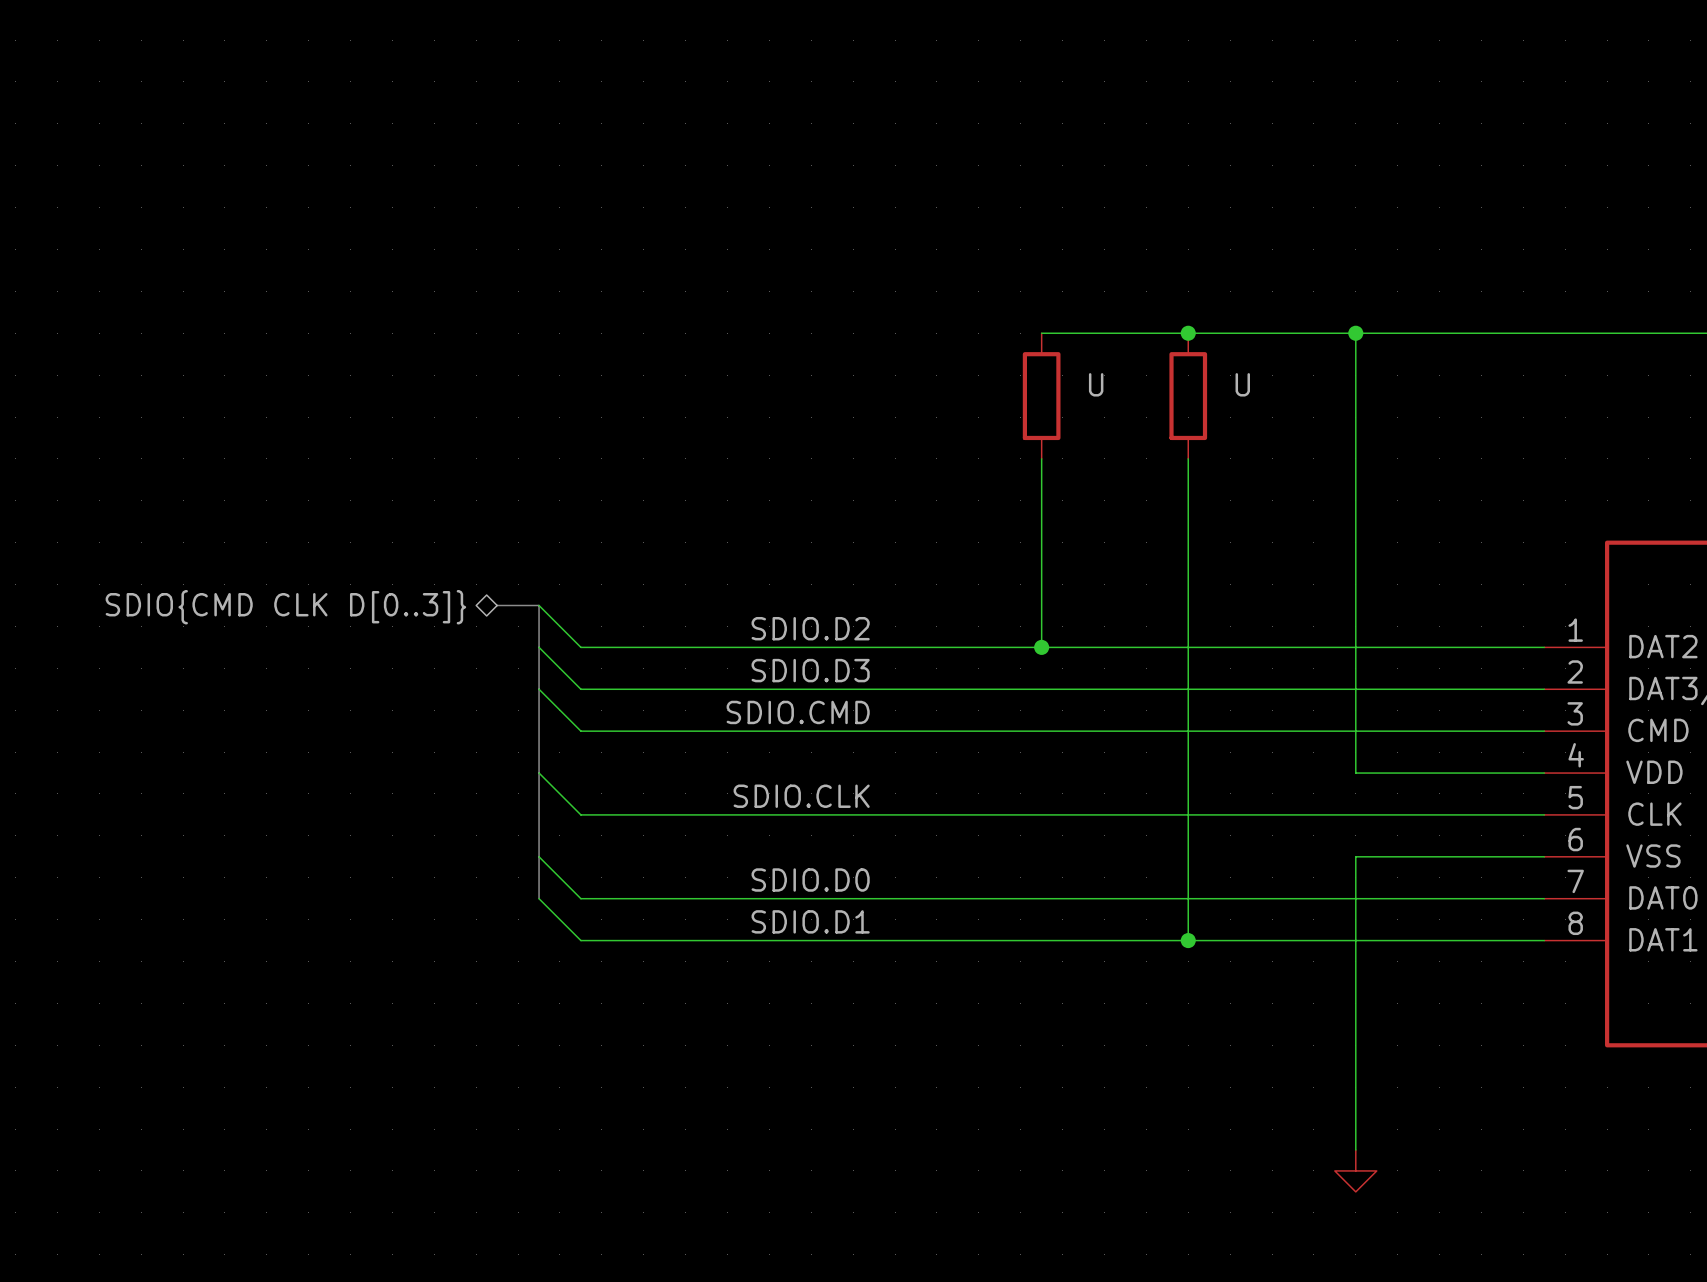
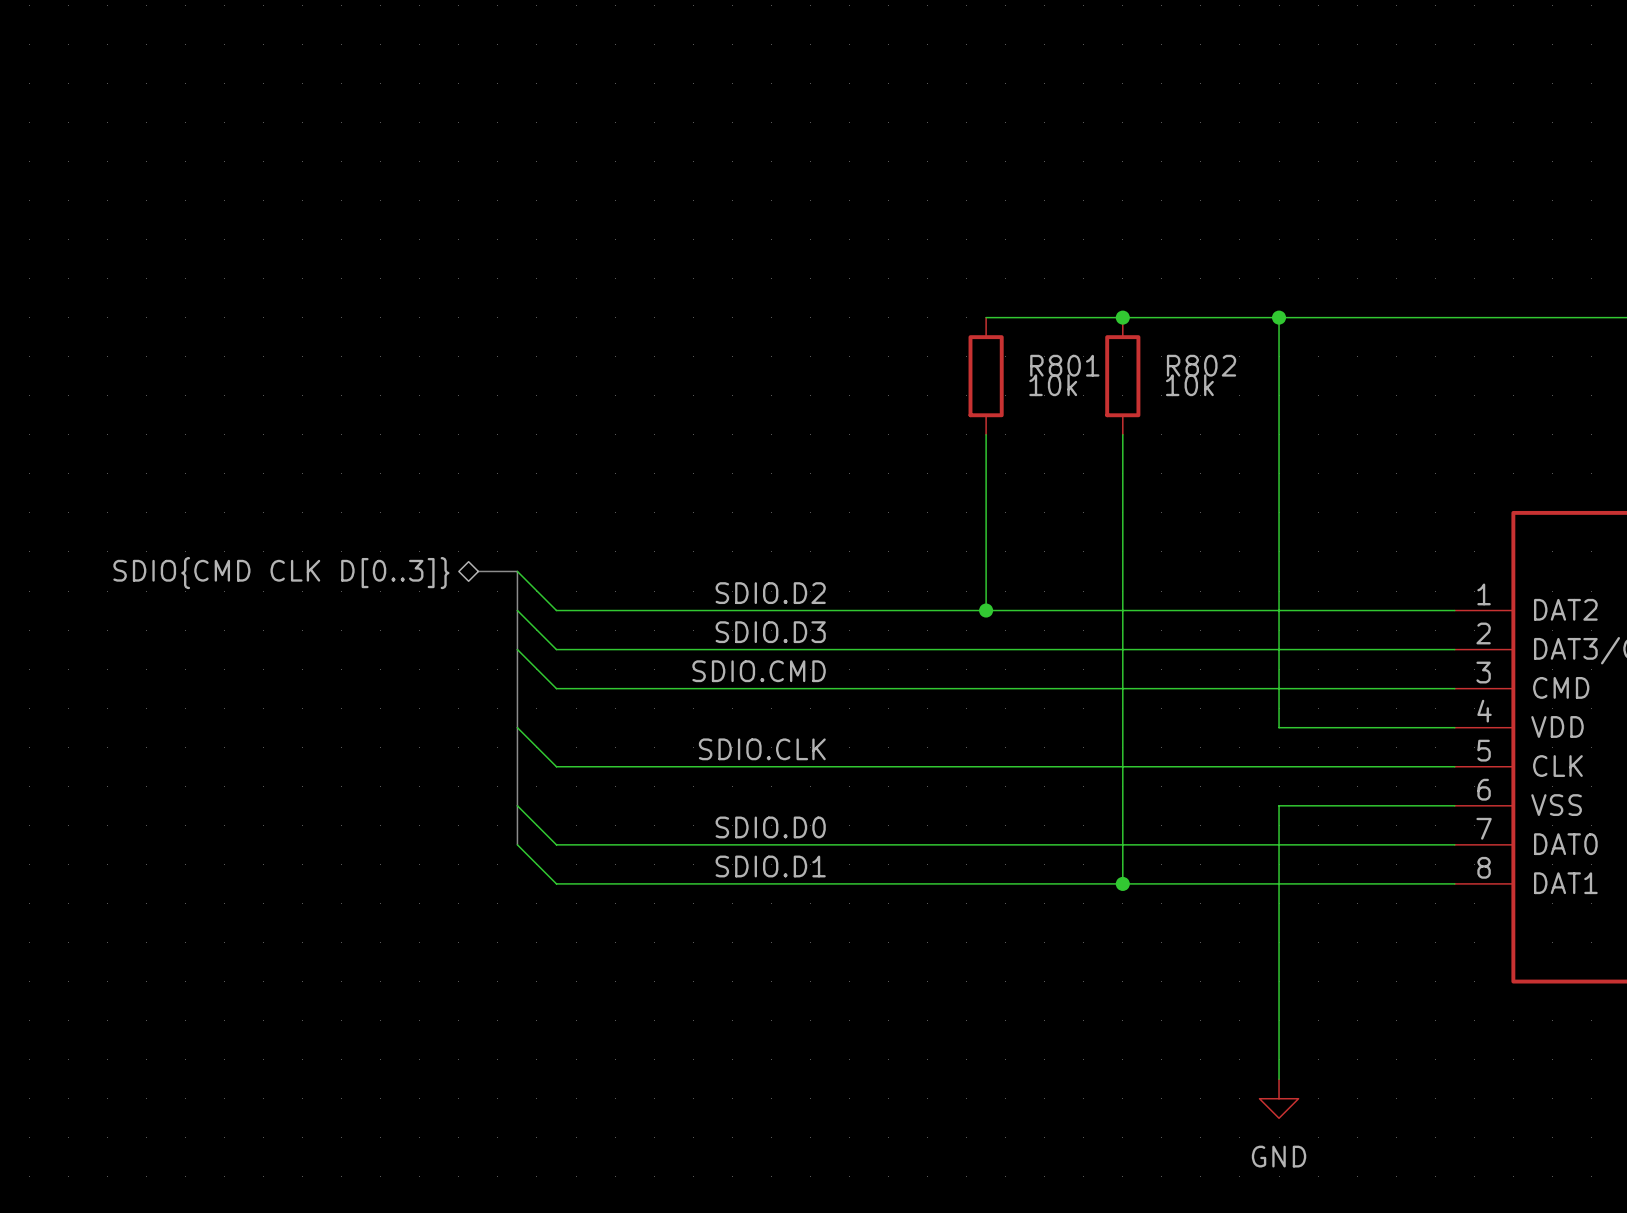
U name: U (1096, 384) -> R801 (1064, 365)
U name: U (1242, 384) -> R802 (1201, 365)
U value: none -> 10k (1053, 385)
U value: none -> 10k (1189, 385)
power symbol text: none -> GND (1279, 1156)

